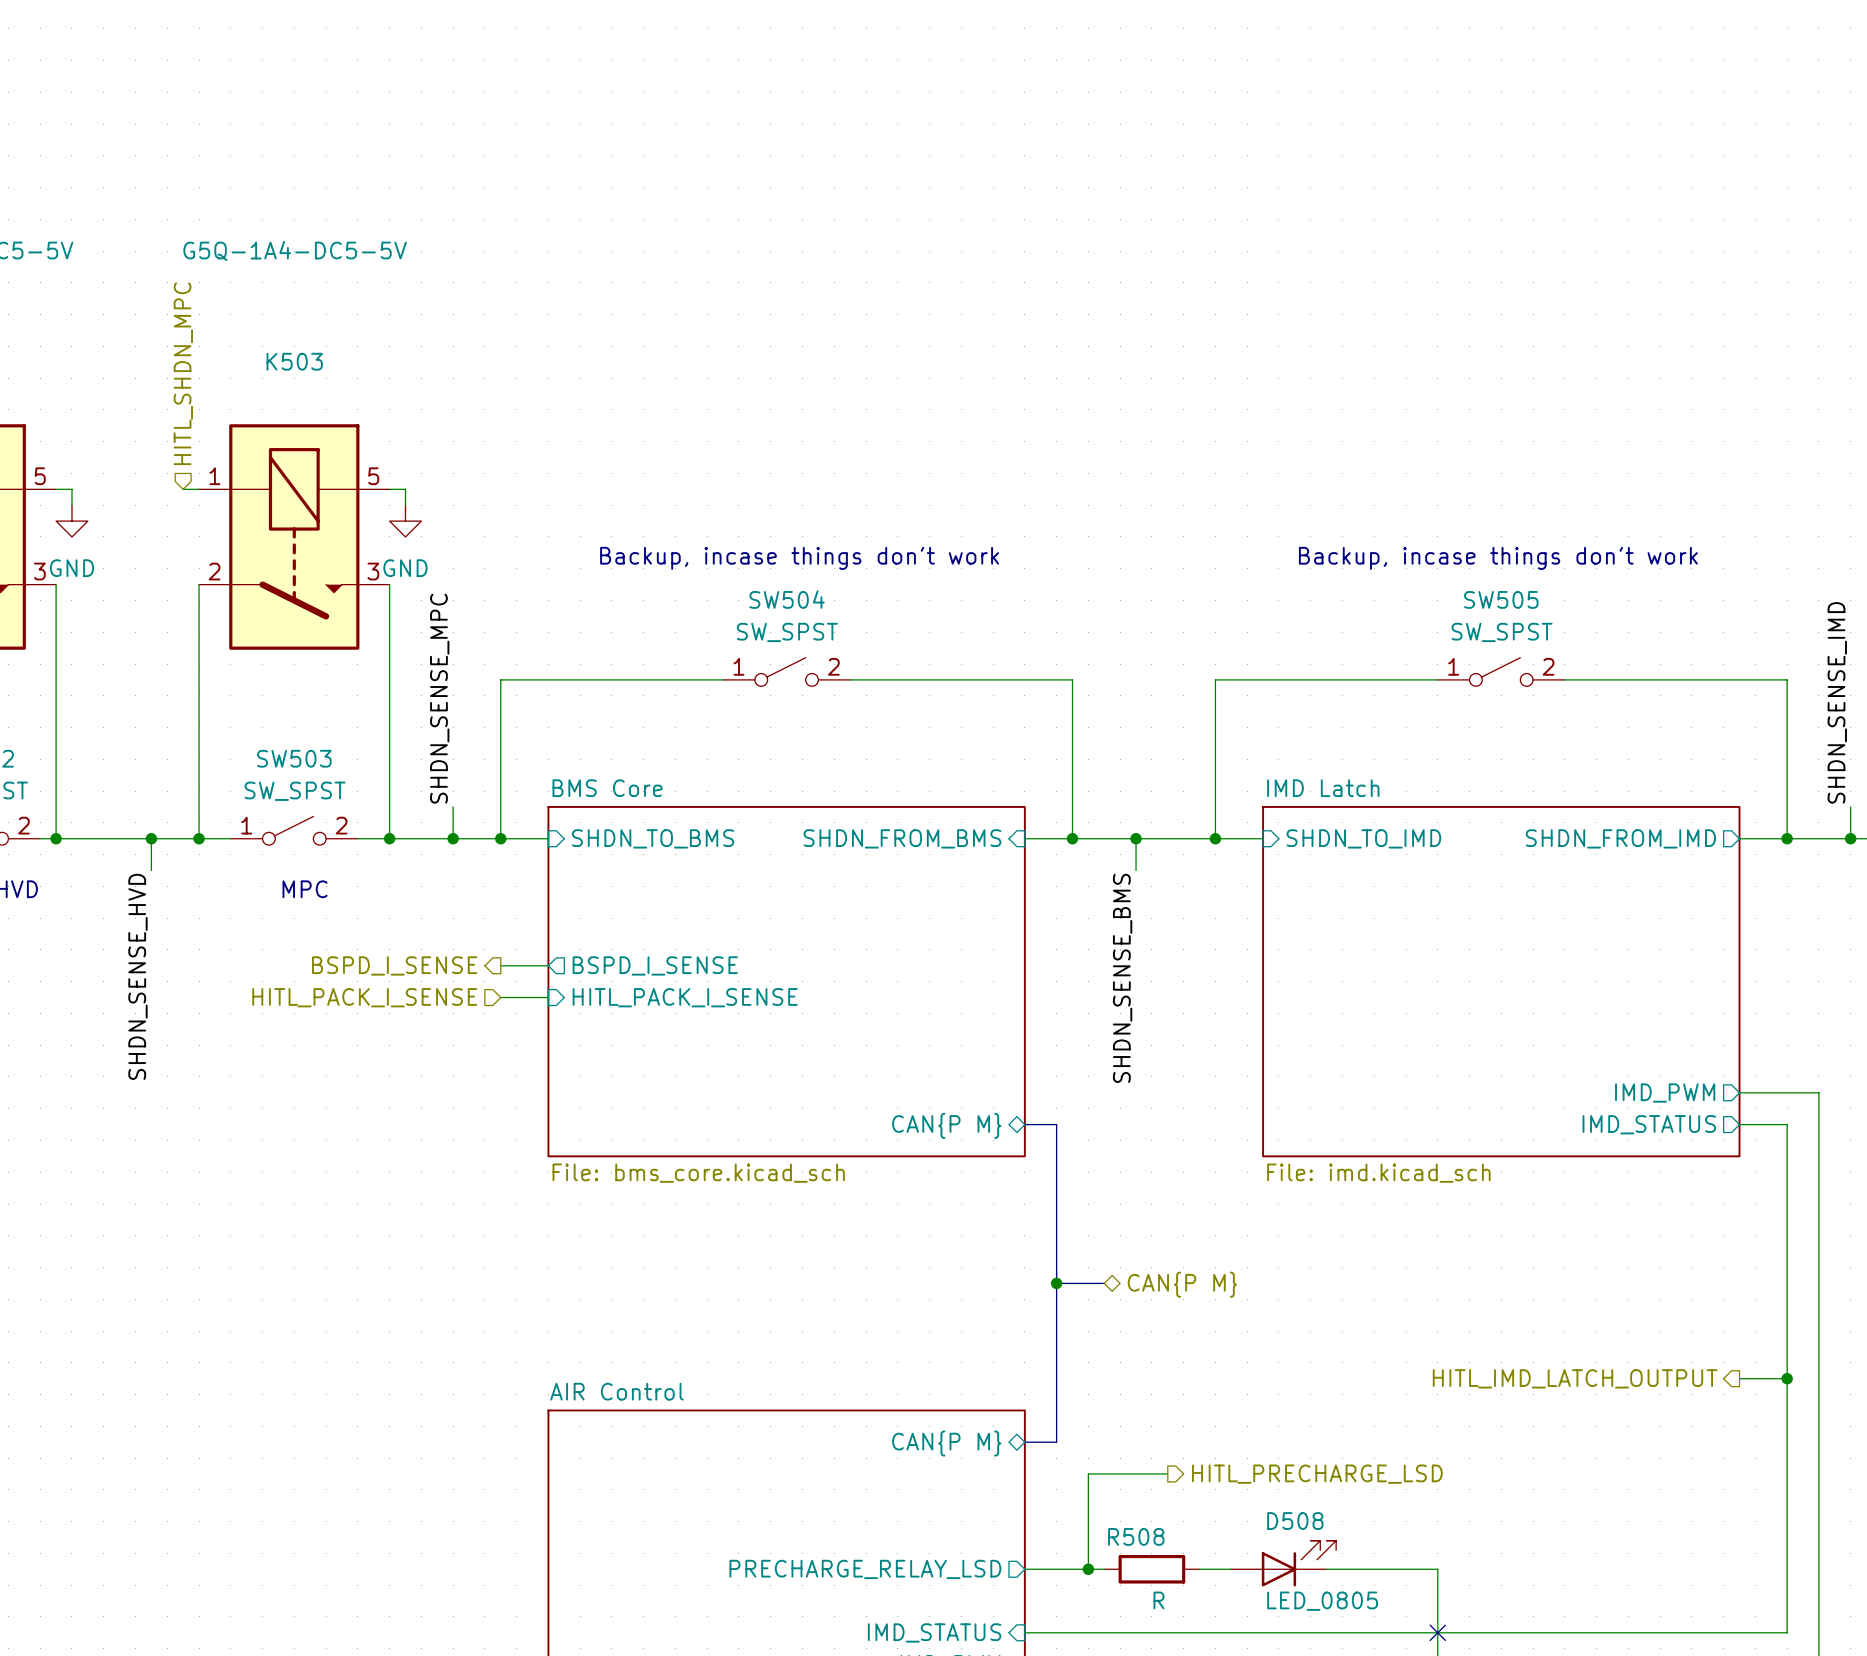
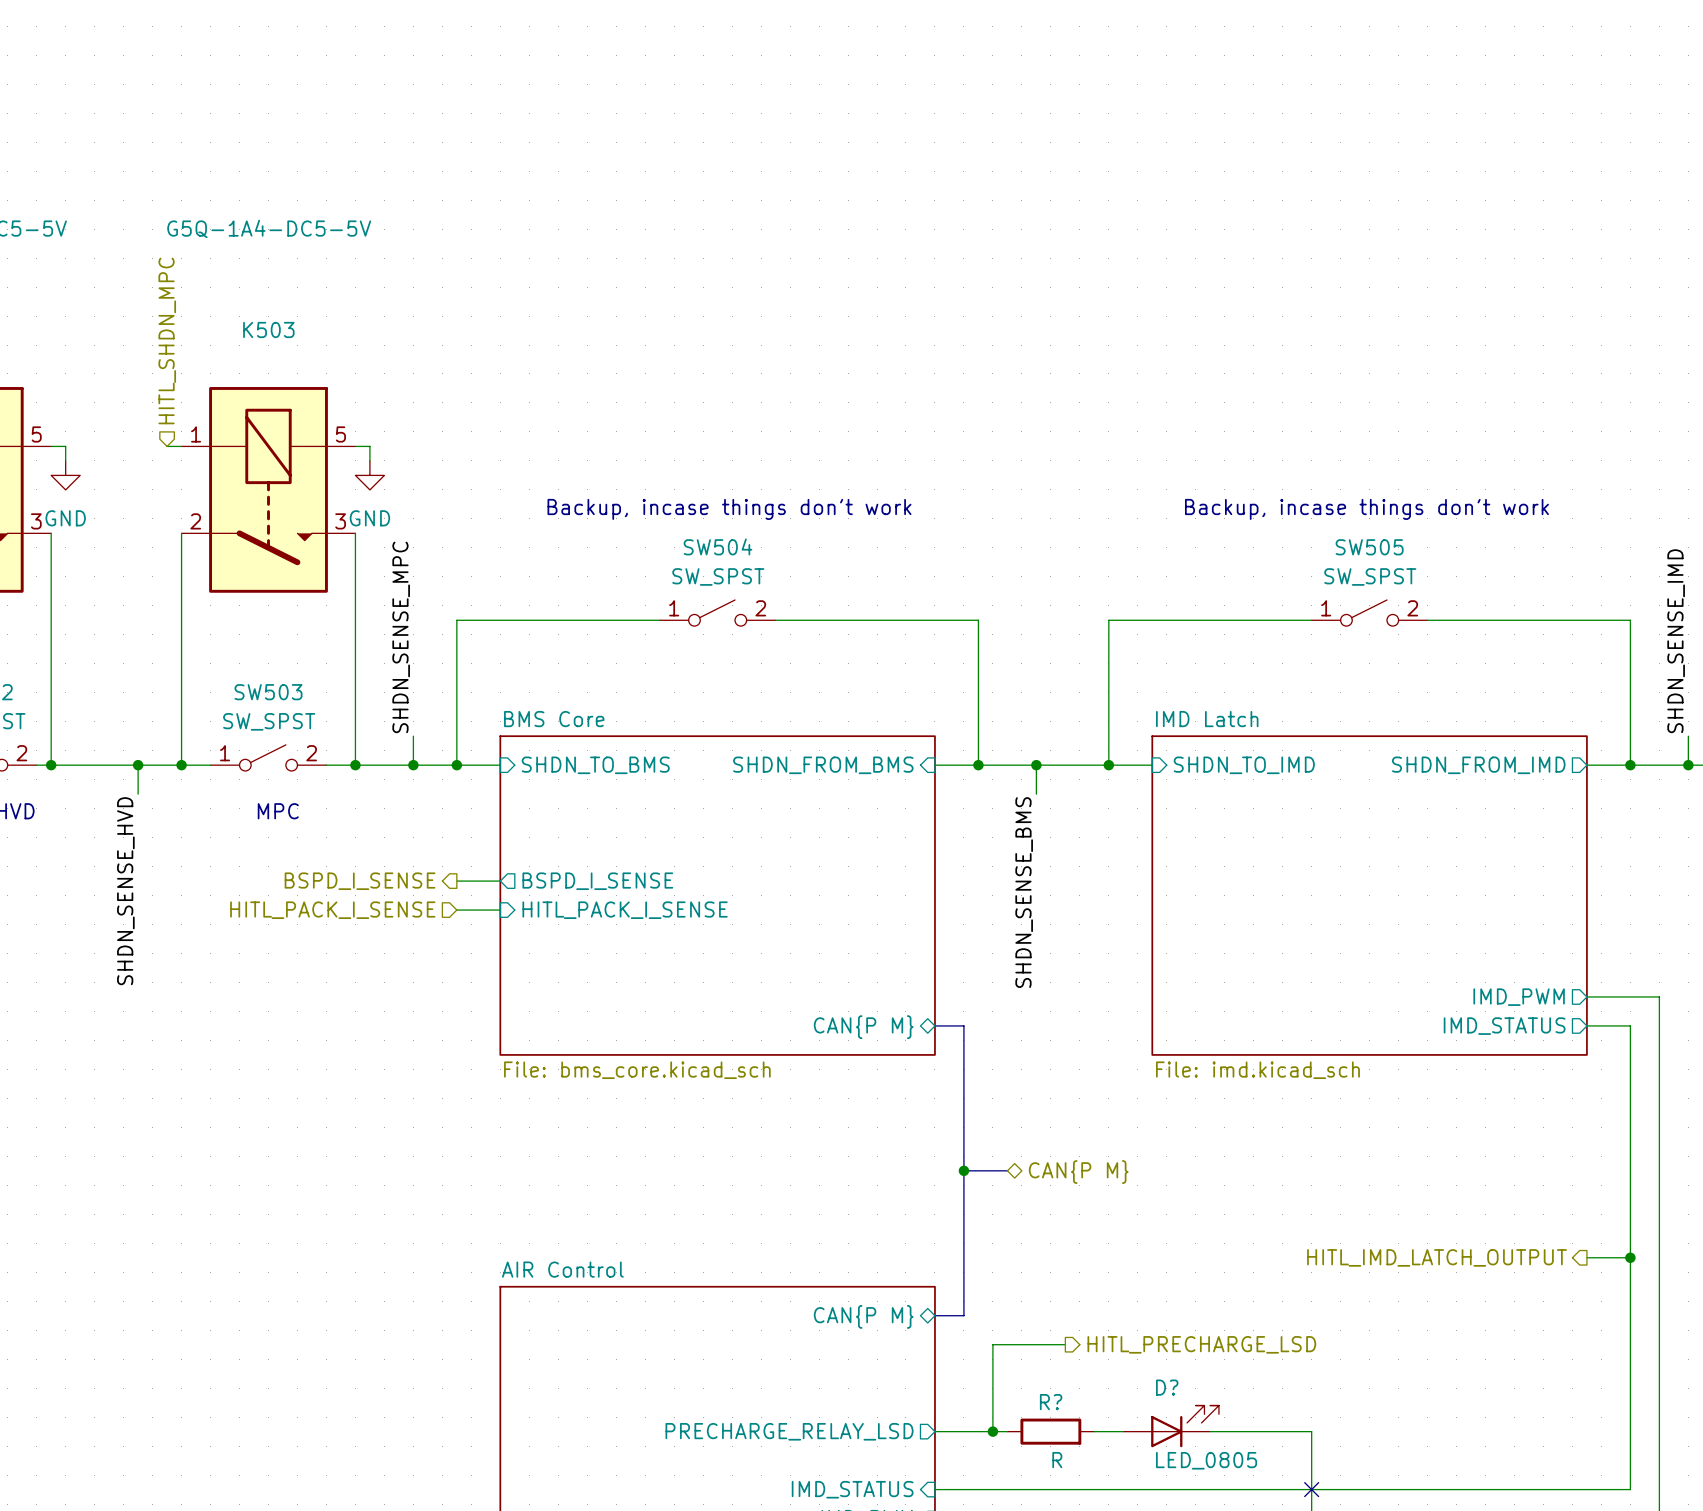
D508 name: D508 (1295, 1521) -> D? (1167, 1387)
R508 name: R508 (1136, 1536) -> R? (1051, 1402)

